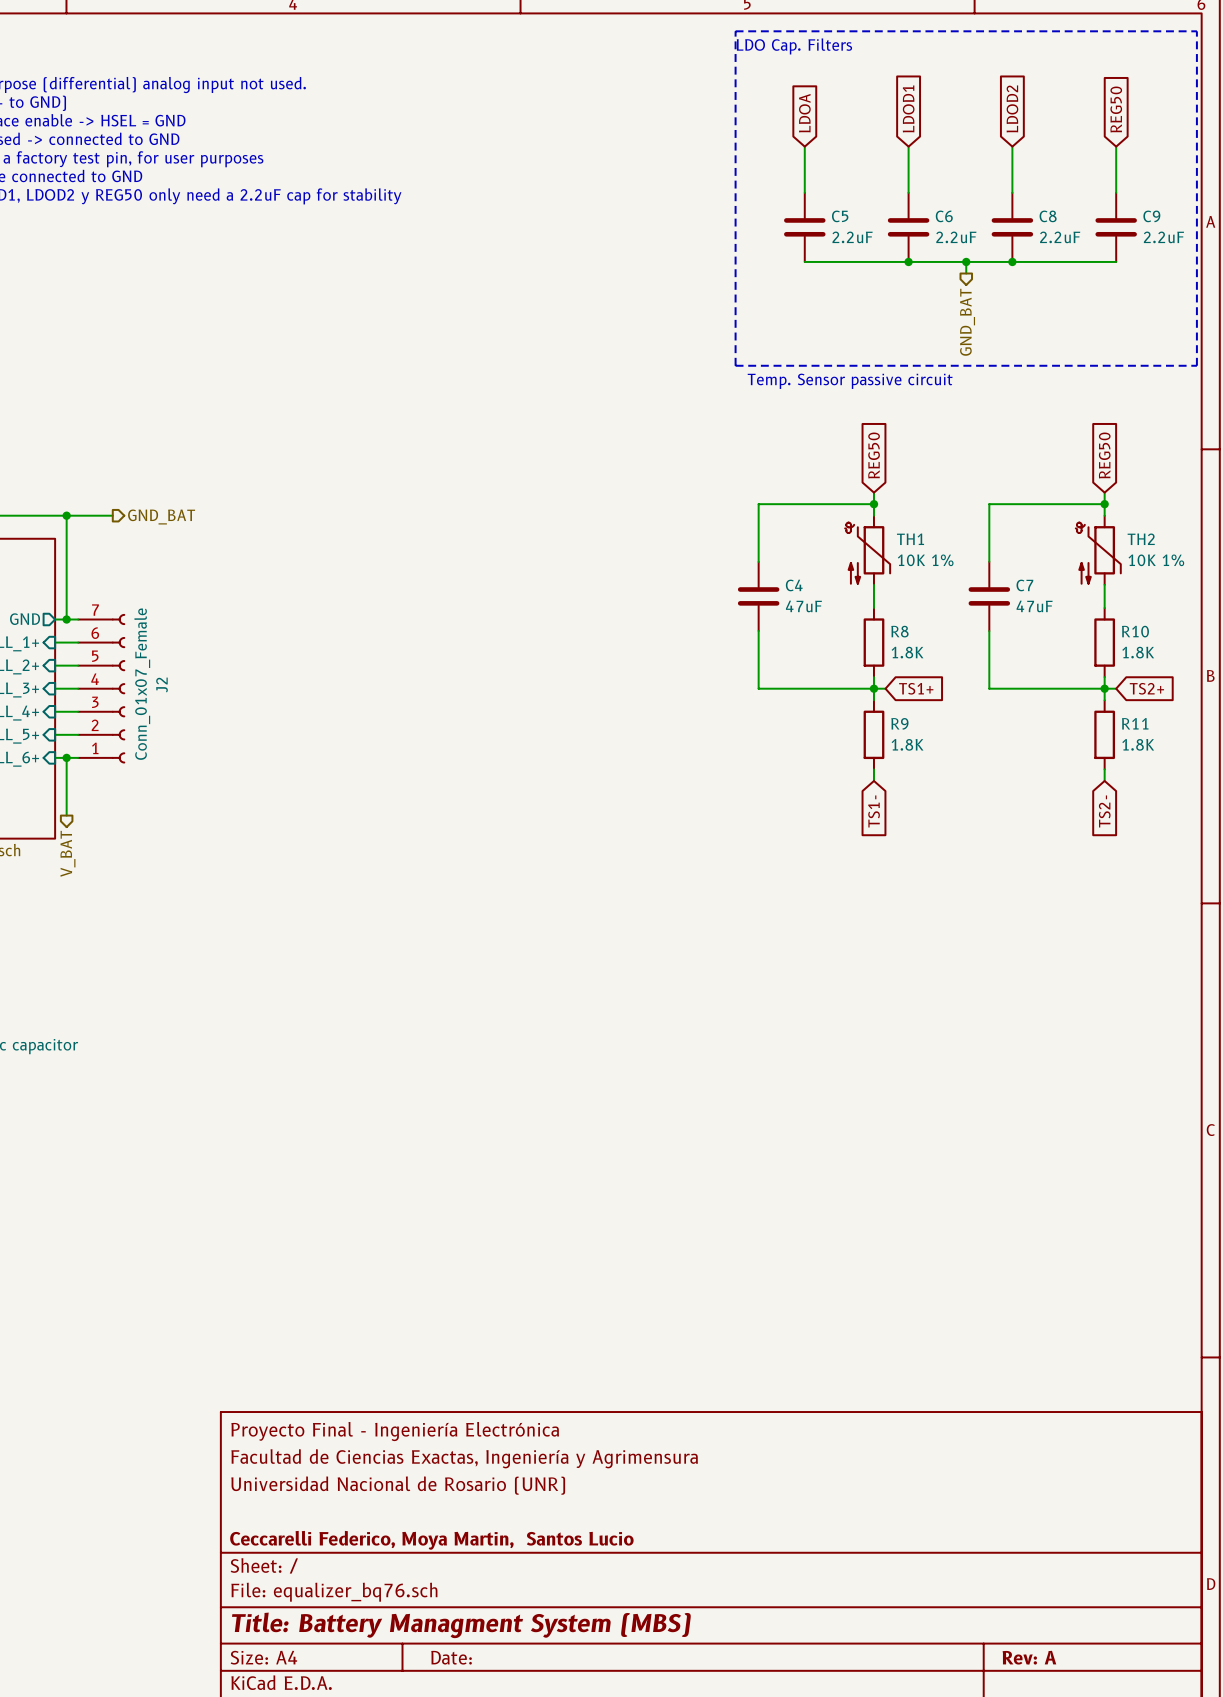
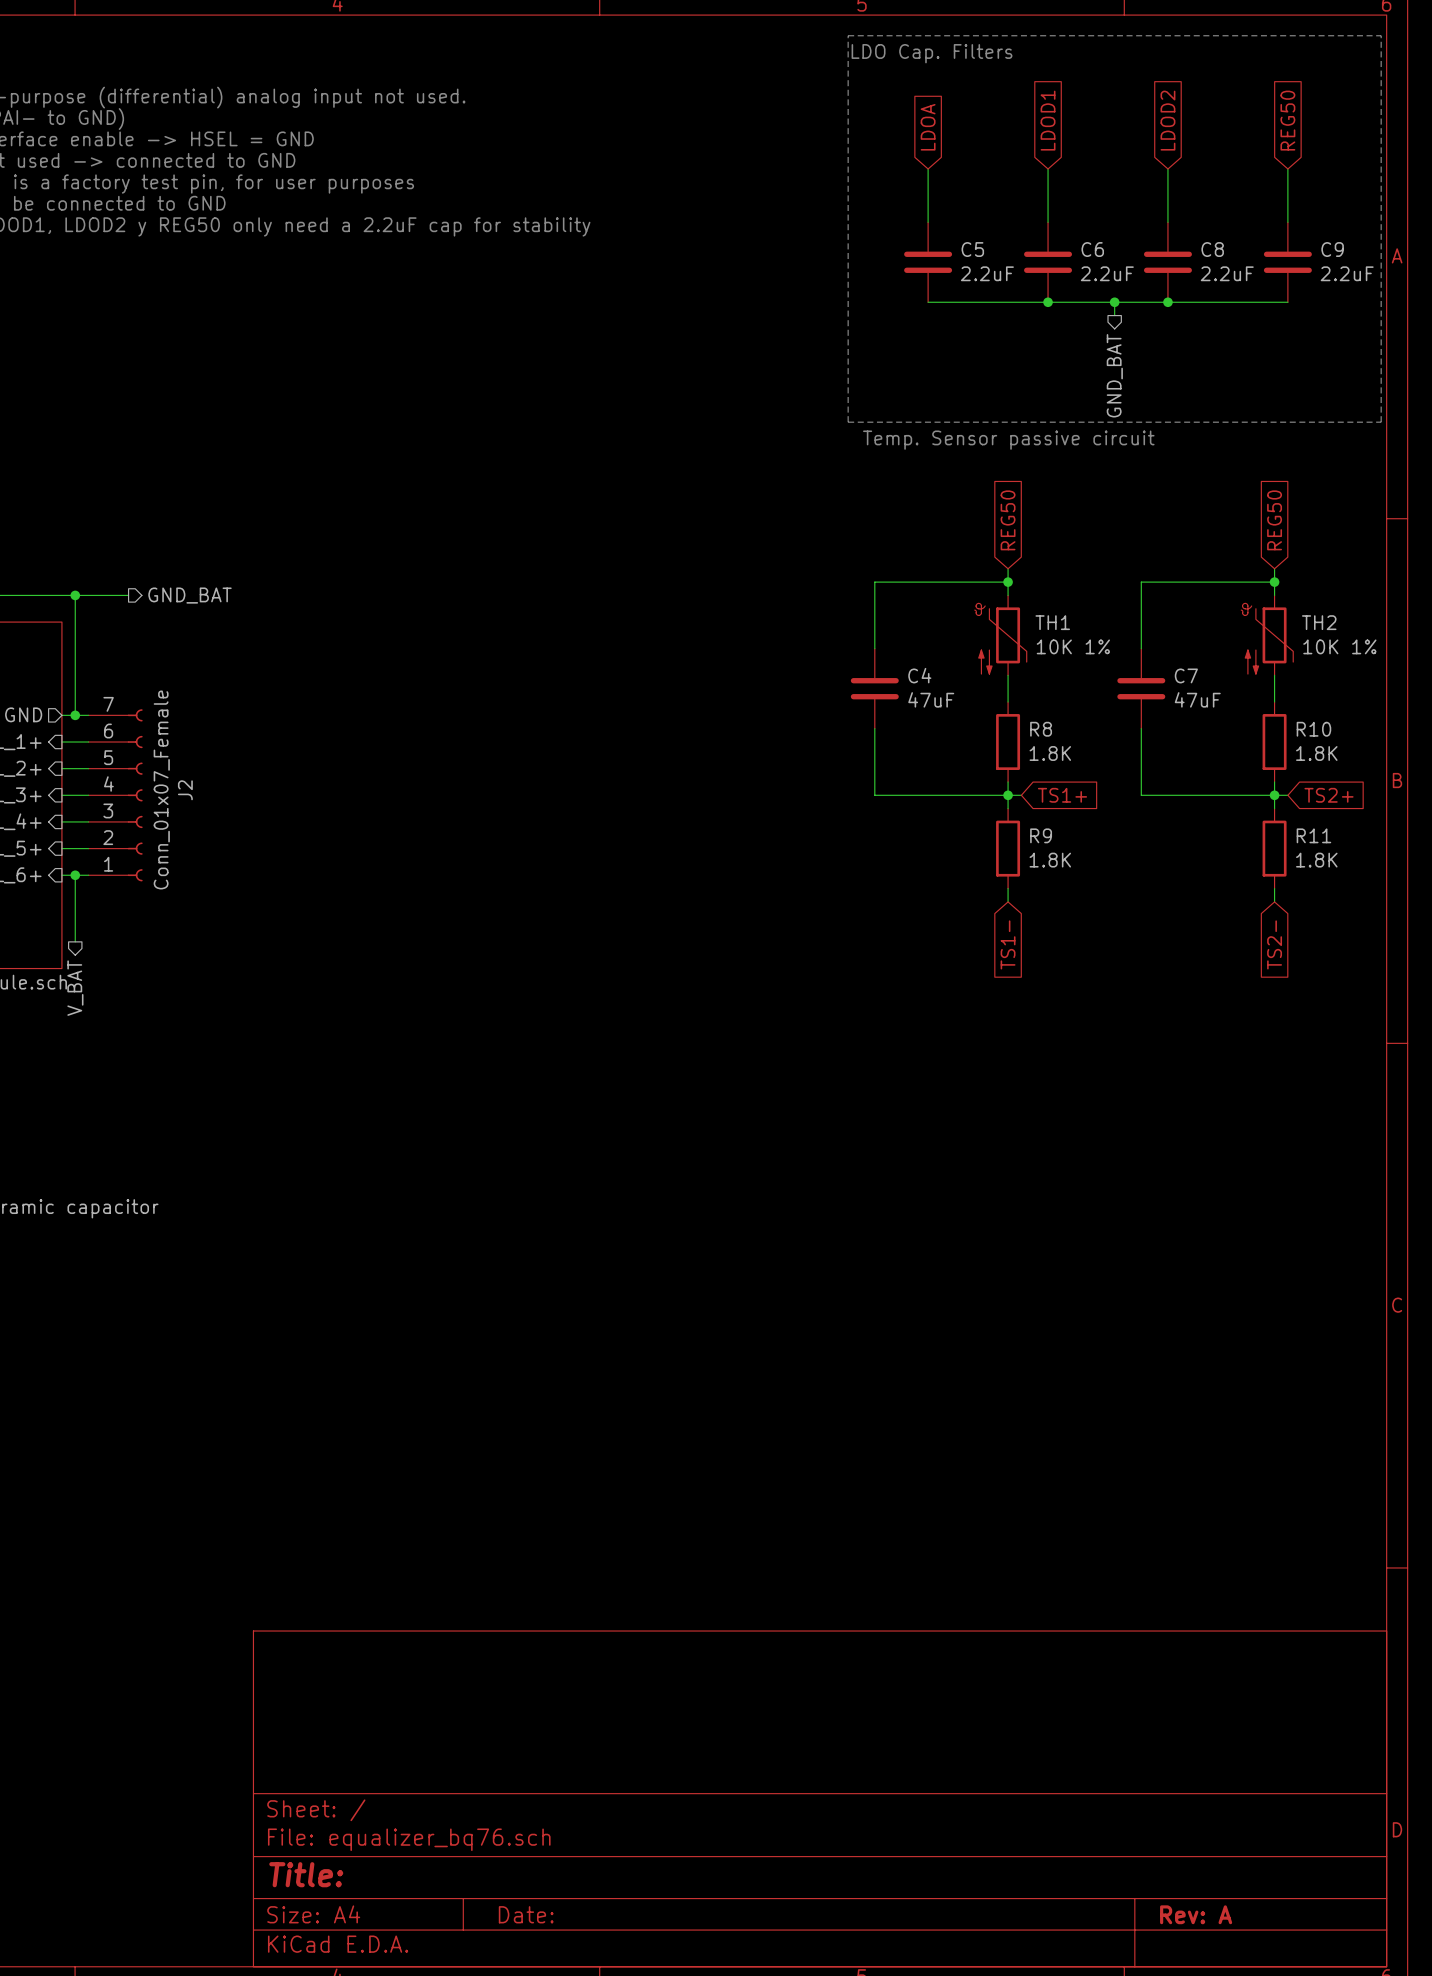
title block: Proyecto Final - Ingeniería Electrónica (395, 1431) -> none
title block: Facultad de Ciencias Exactas, Ingeniería y Agrimensura (464, 1458) -> none
title block: Universidad Nacional de Rosario (UNR) (398, 1485) -> none
title block: Ceccarelli Federico, Moya Martin, Santos Lucio (431, 1540) -> none
title block: Title: Battery Managment System (MBS) (461, 1625) -> Title: (306, 1874)

